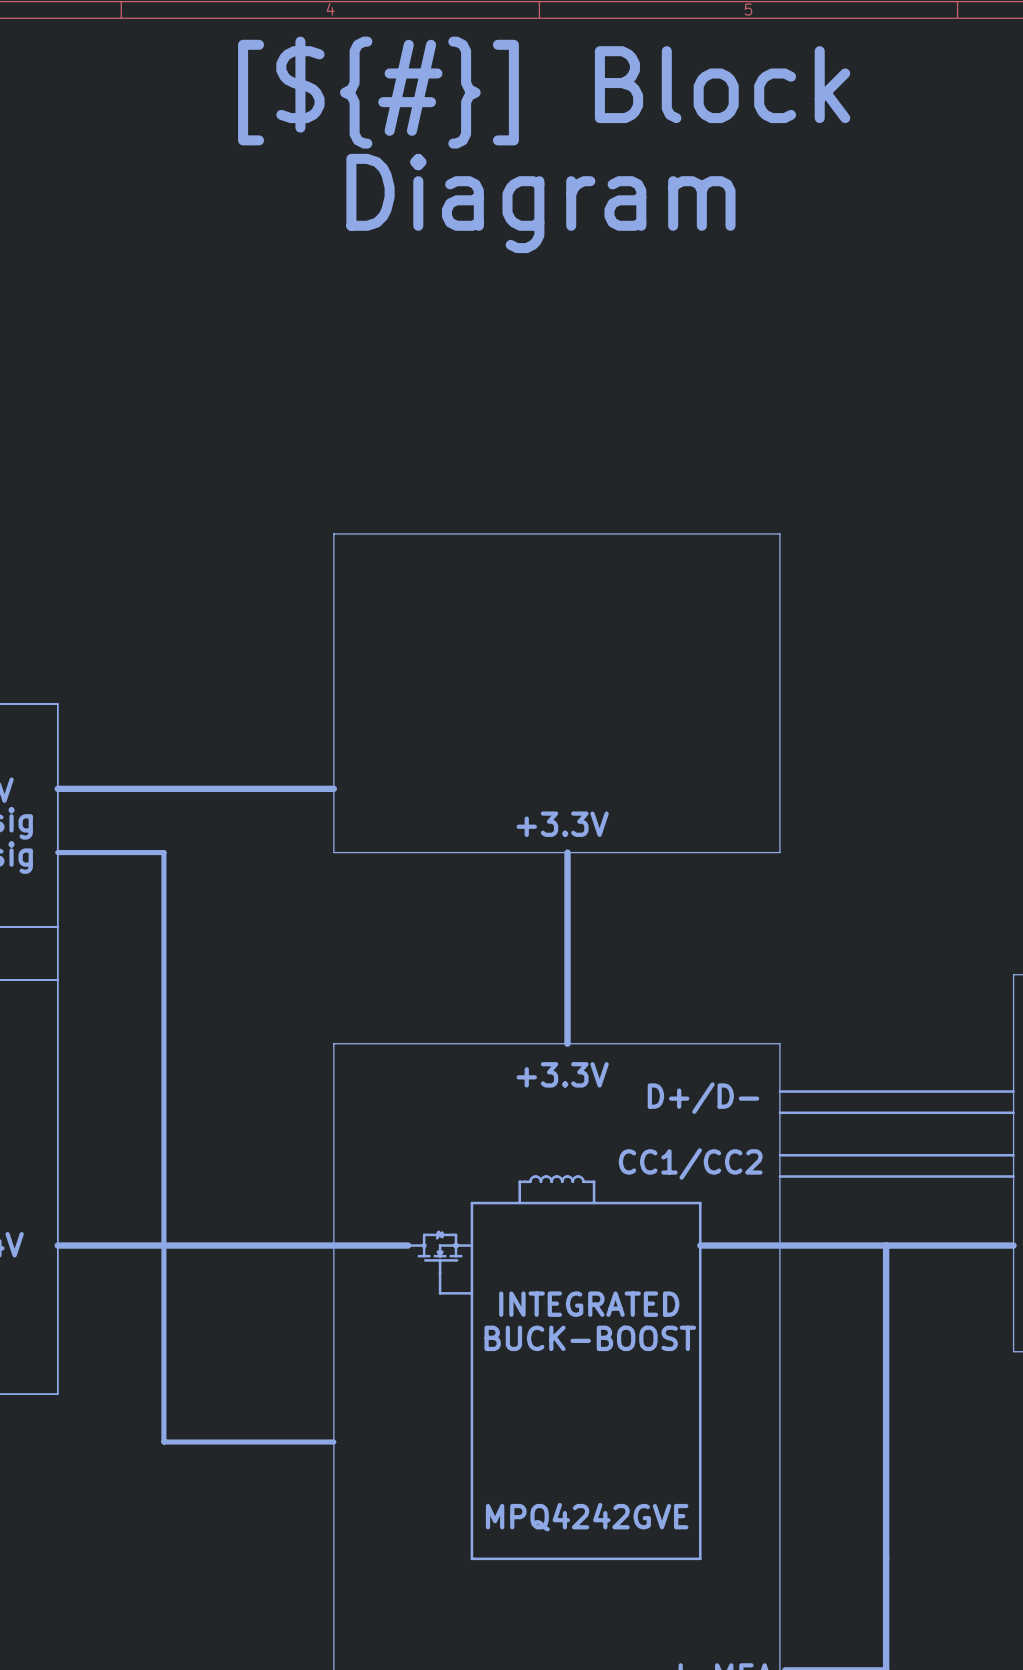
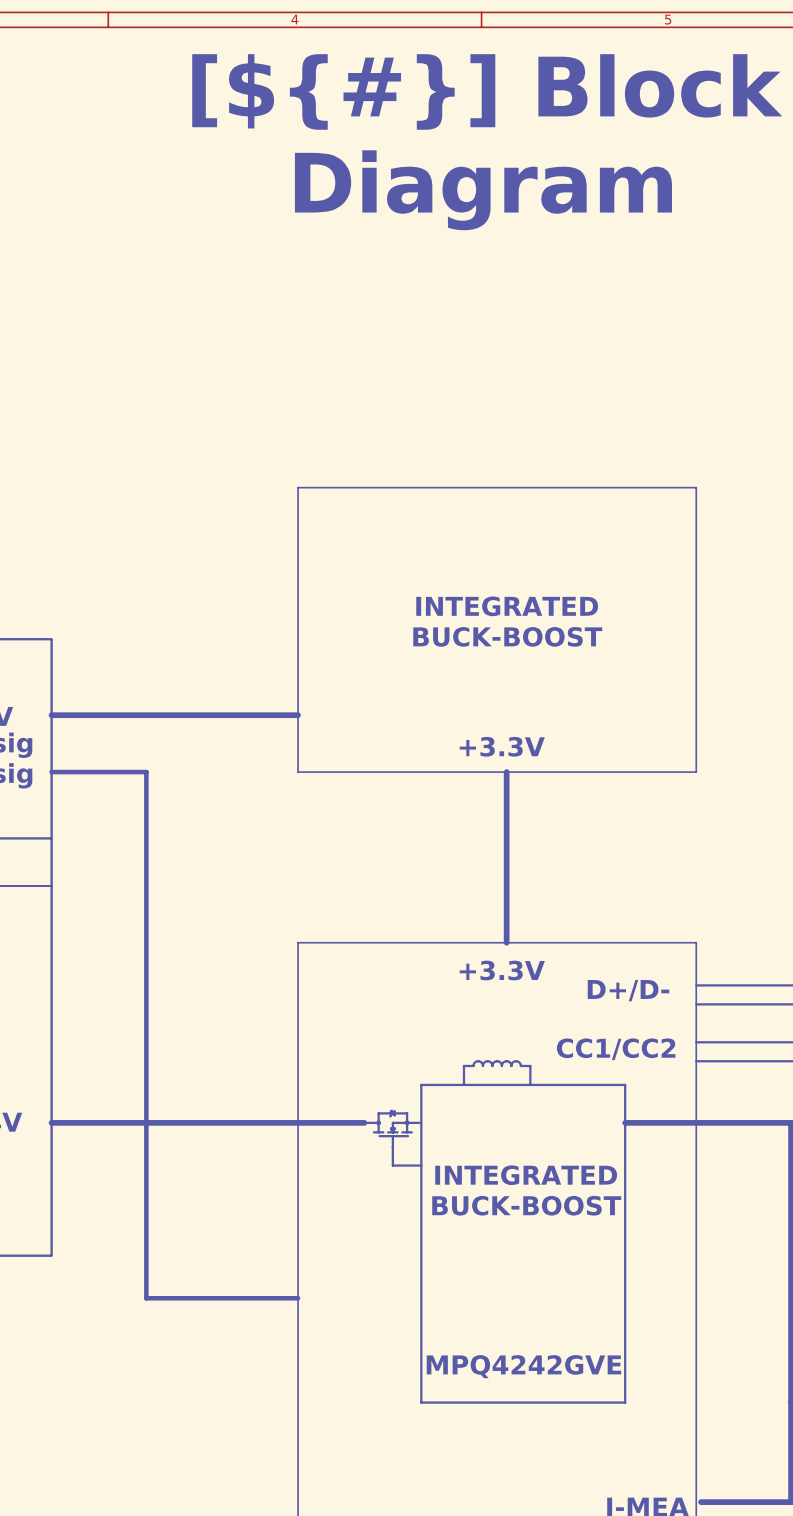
text: none -> INTEGRATED (507, 606)
text: none -> BUCK-BOOST (507, 636)

